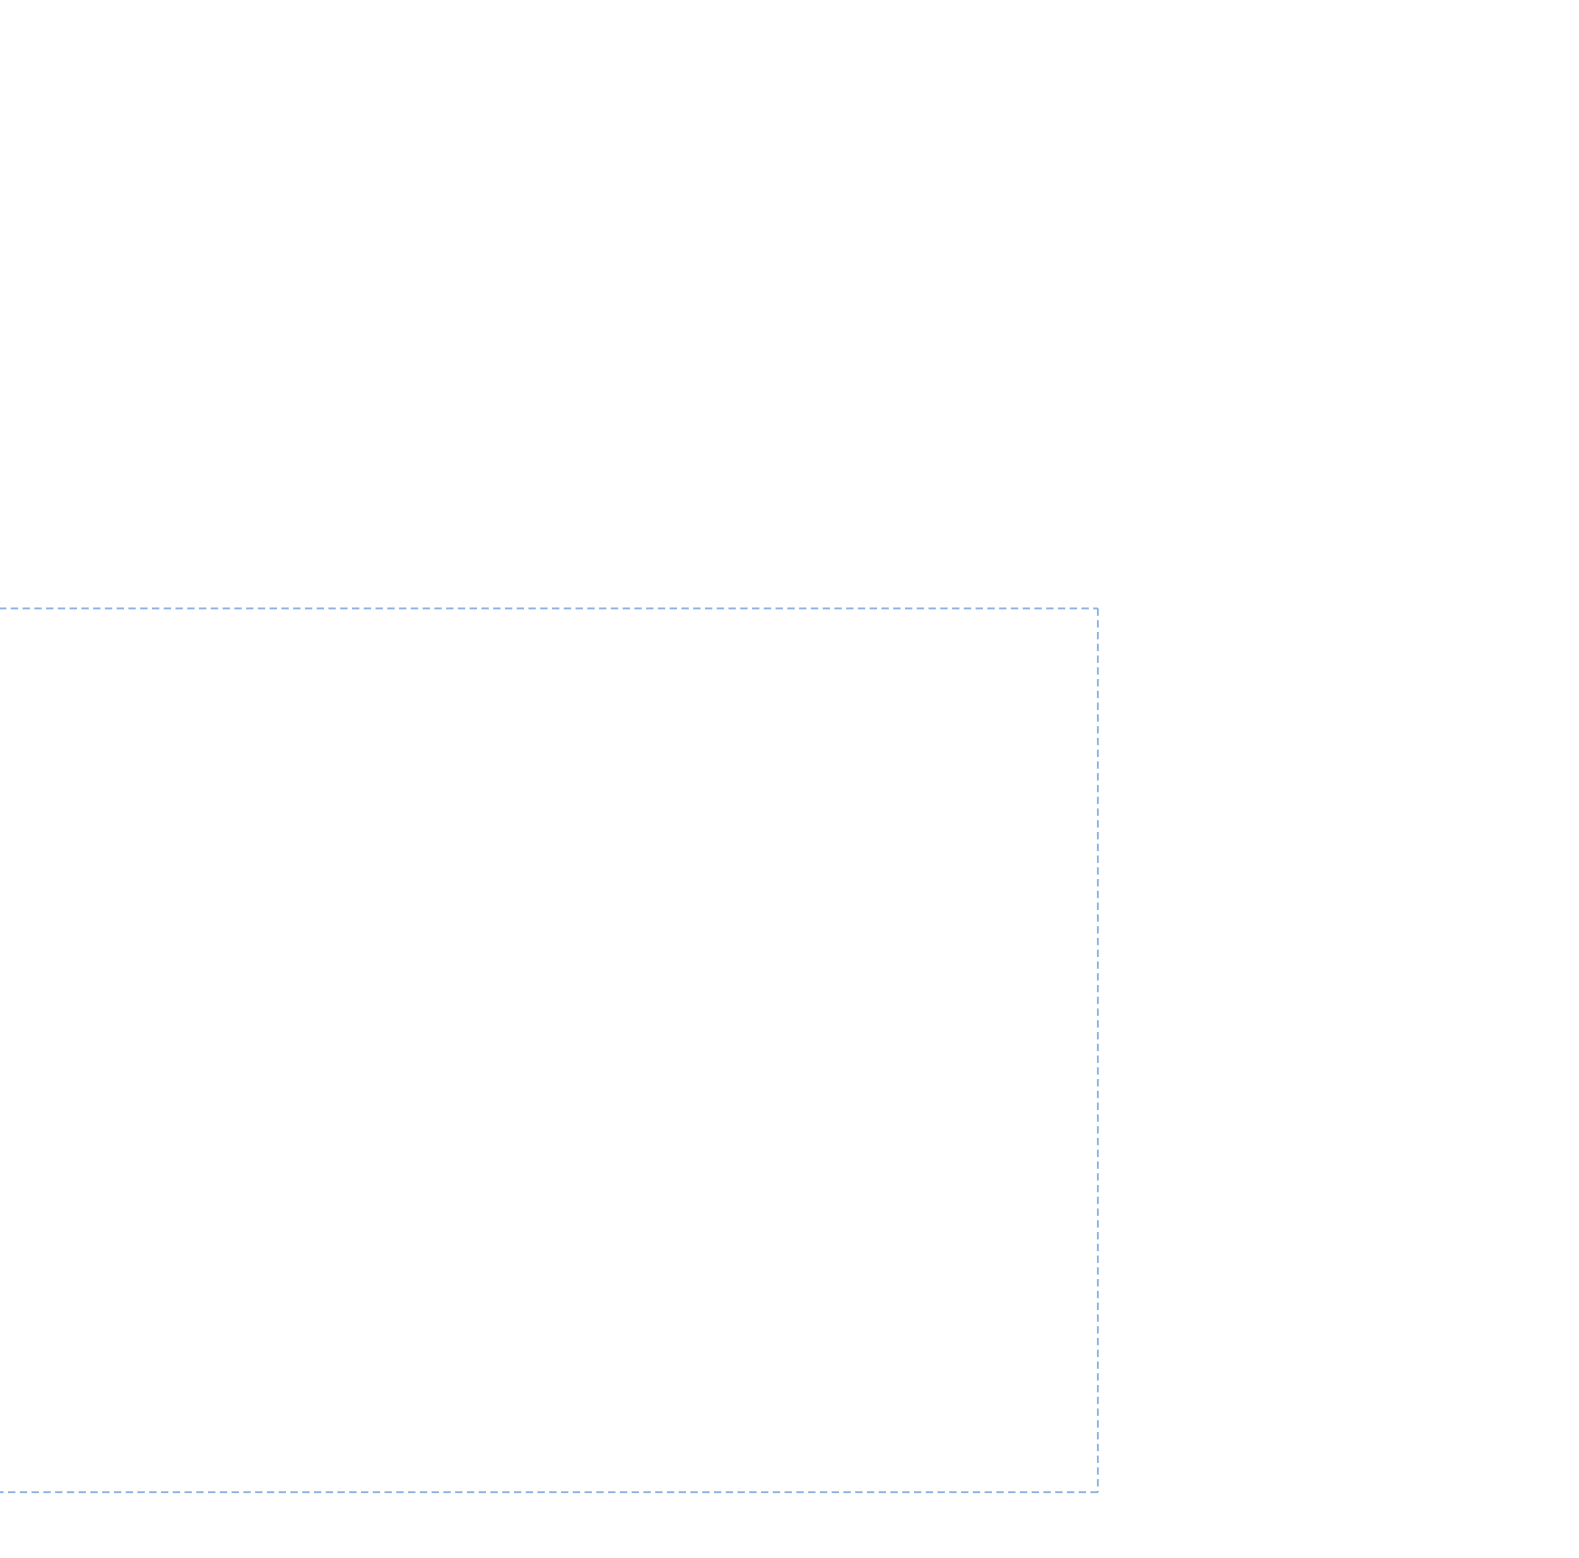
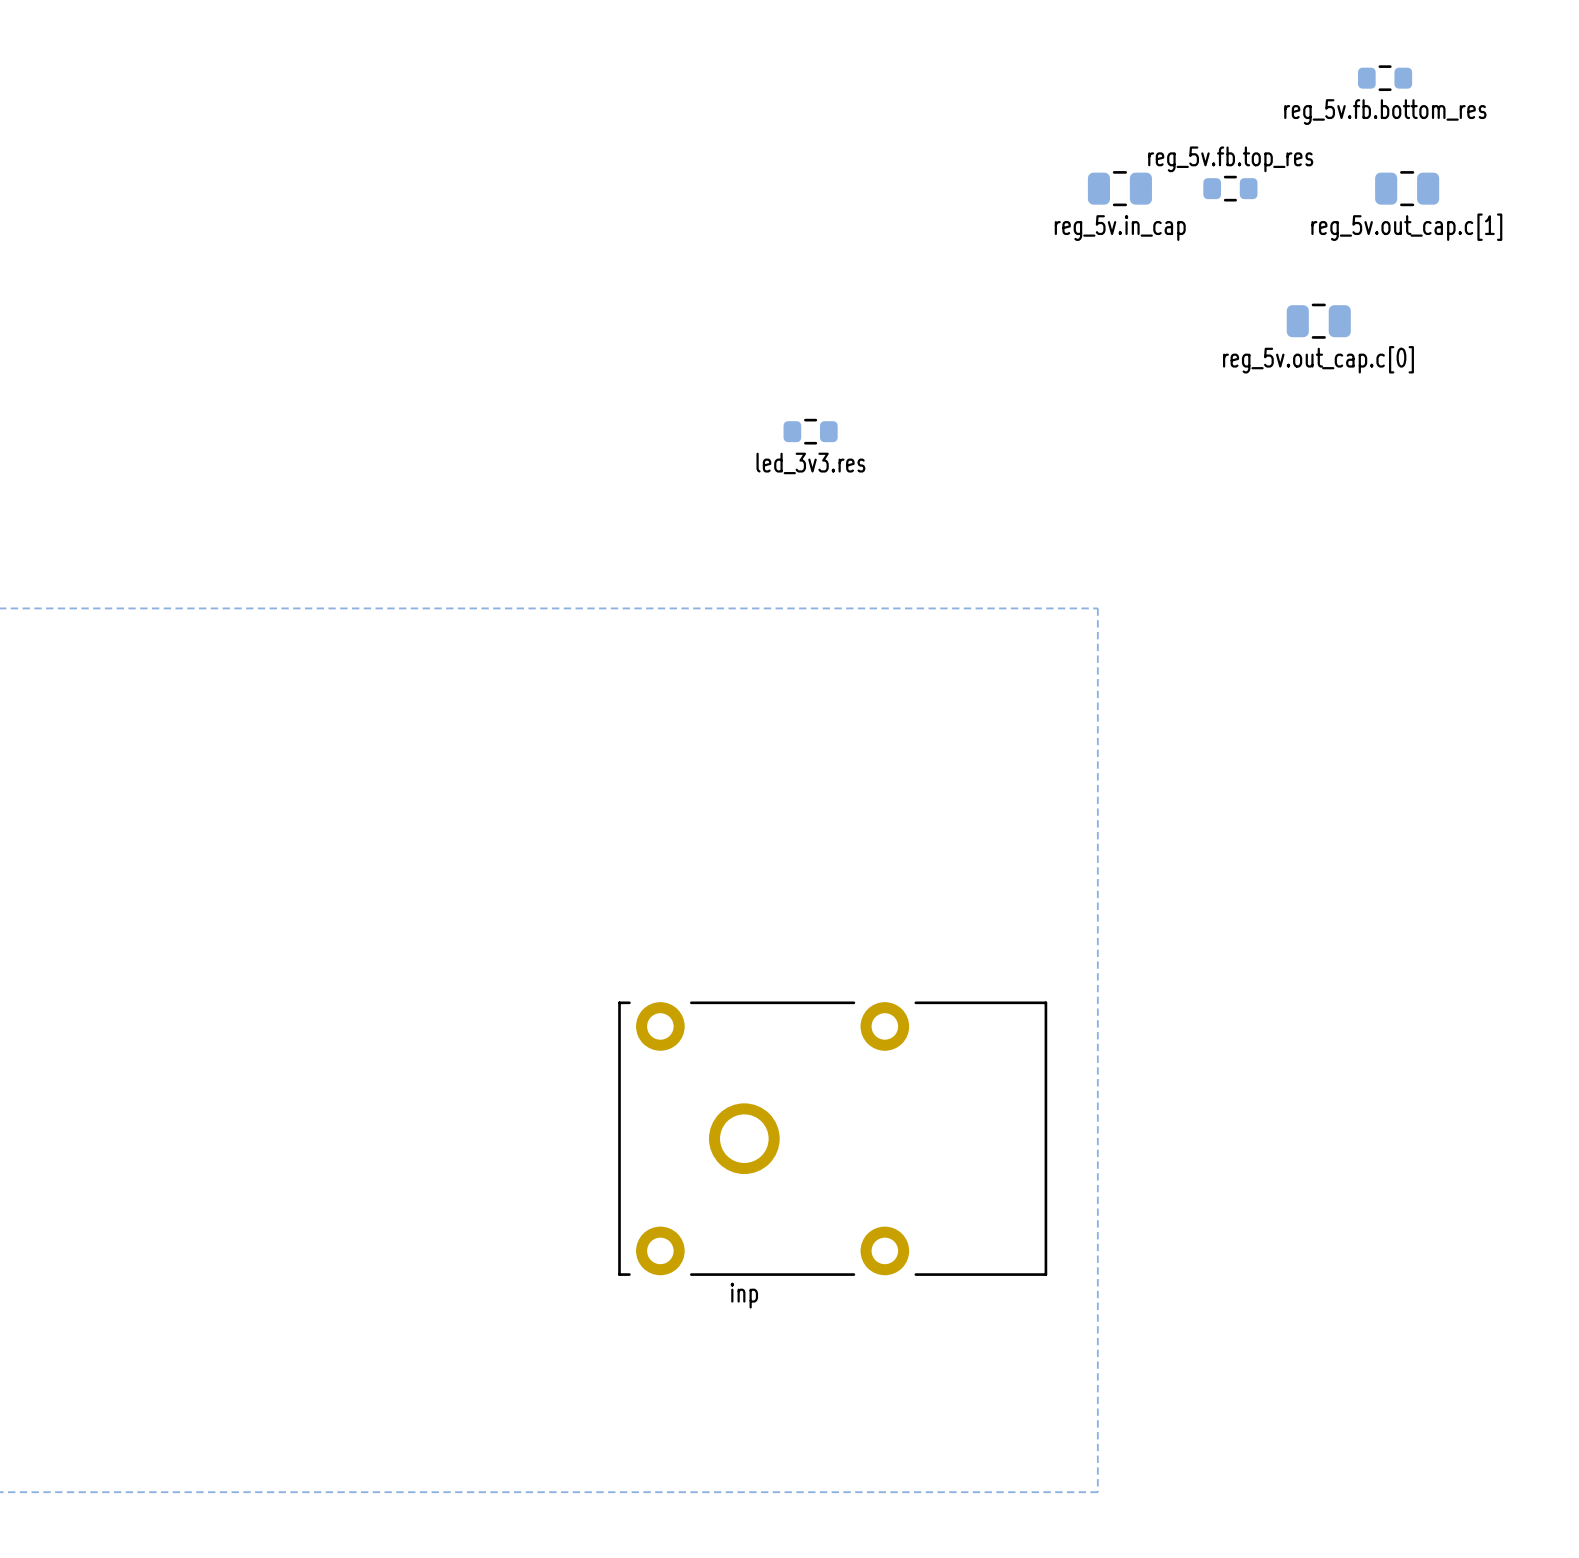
reg_5v.fb.bottom_res: none -> (1385, 78)
reg_5v.in_cap: none -> (1119, 188)
reg_5v.fb.top_res: none -> (1230, 188)
reg_5v.out_cap.c[1]: none -> (1407, 188)
reg_5v.out_cap.c[0]: none -> (1318, 321)
led_3v3.res: none -> (810, 431)
inp: none -> (832, 1138)

